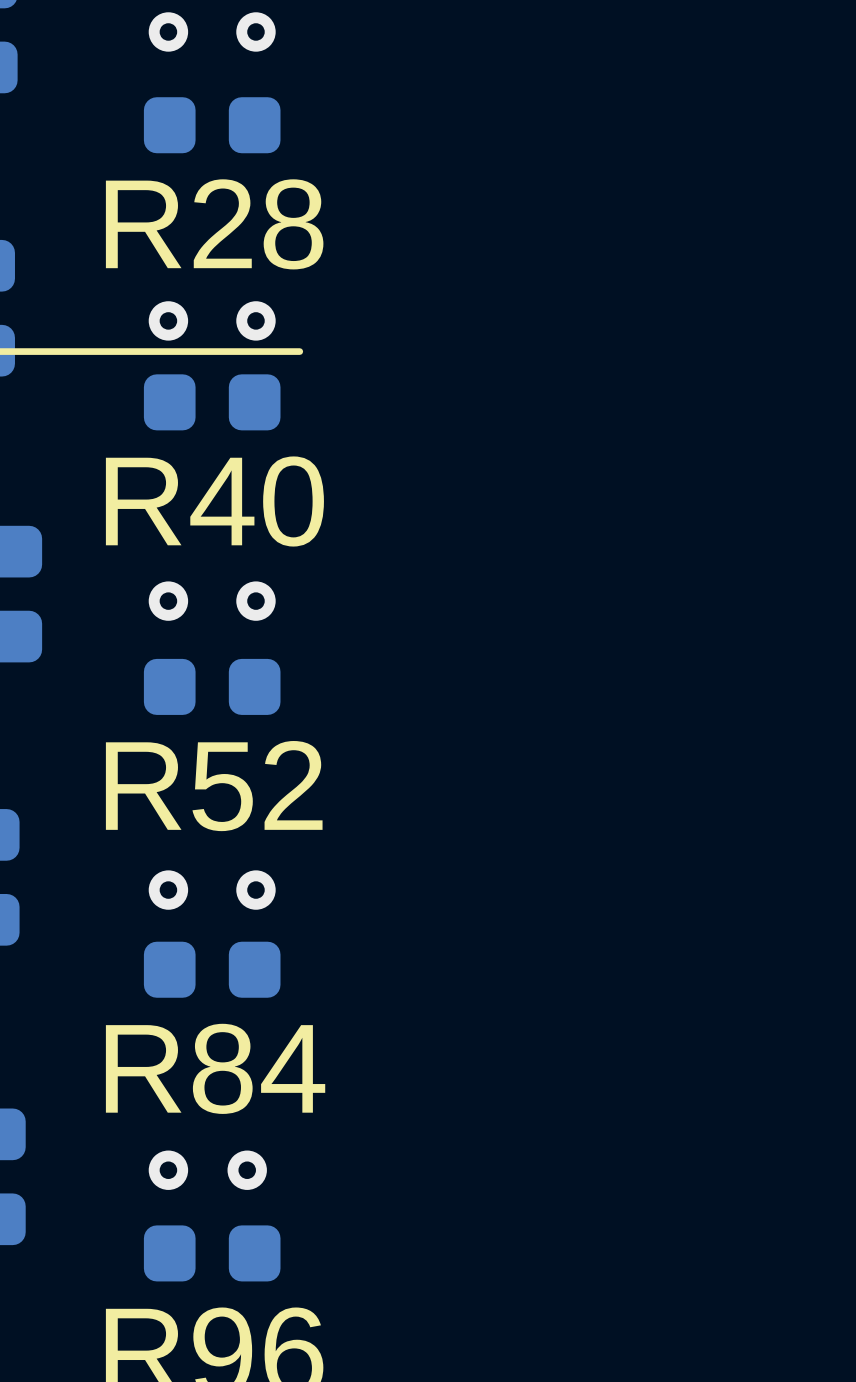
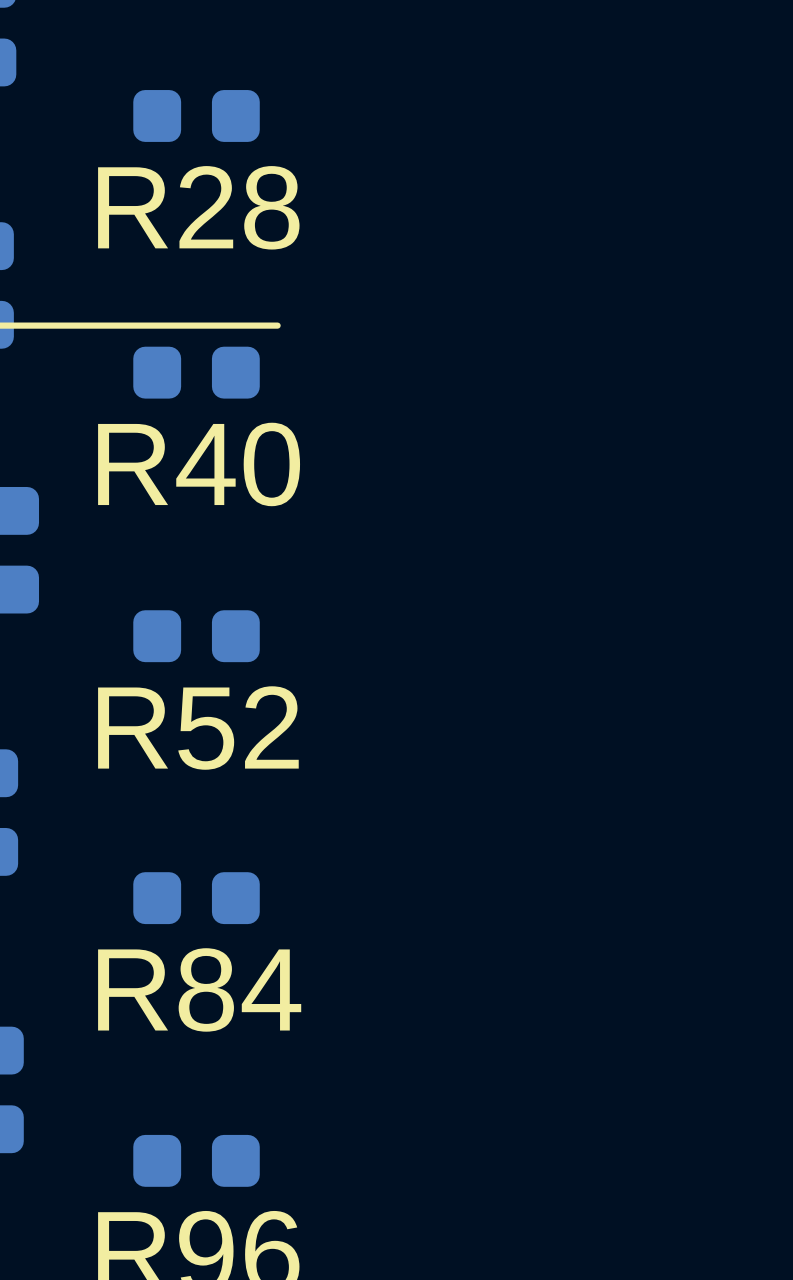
via: (168, 31) -> none
via: (255, 31) -> none
via: (168, 320) -> none
via: (255, 320) -> none
via: (168, 601) -> none
via: (255, 601) -> none
via: (168, 890) -> none
via: (255, 890) -> none
via: (168, 1170) -> none
via: (247, 1170) -> none

